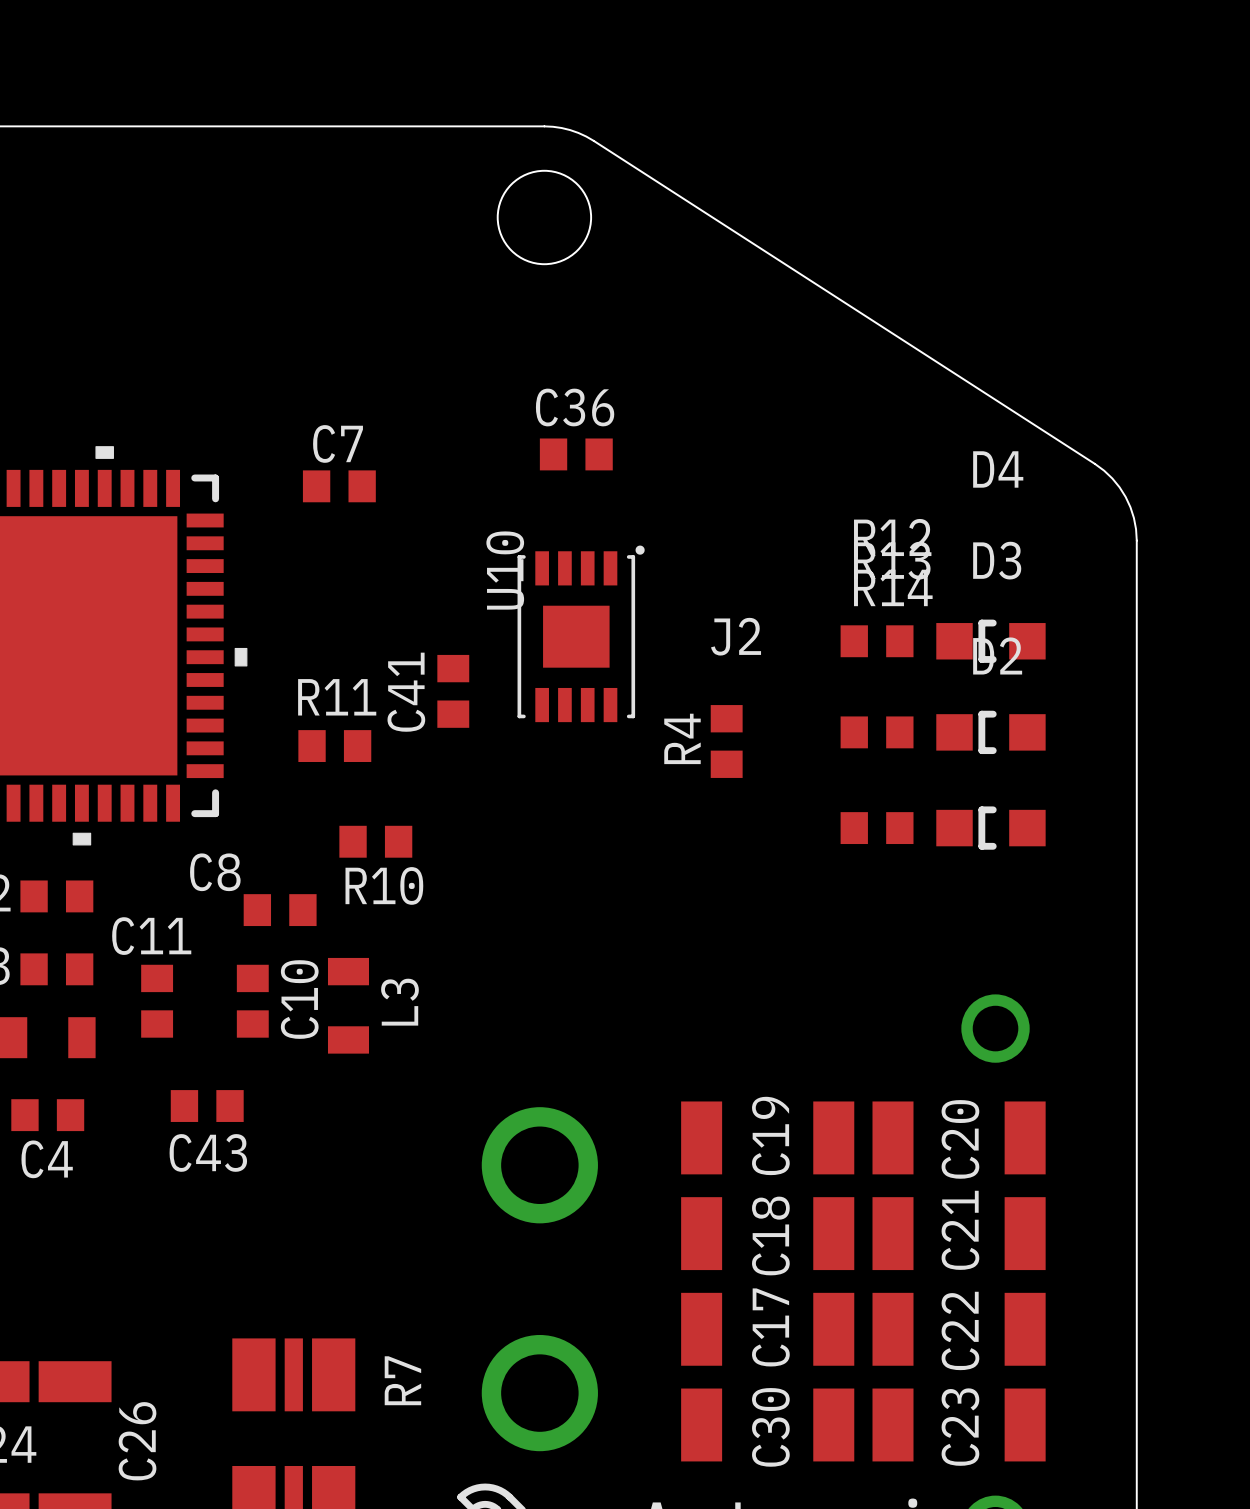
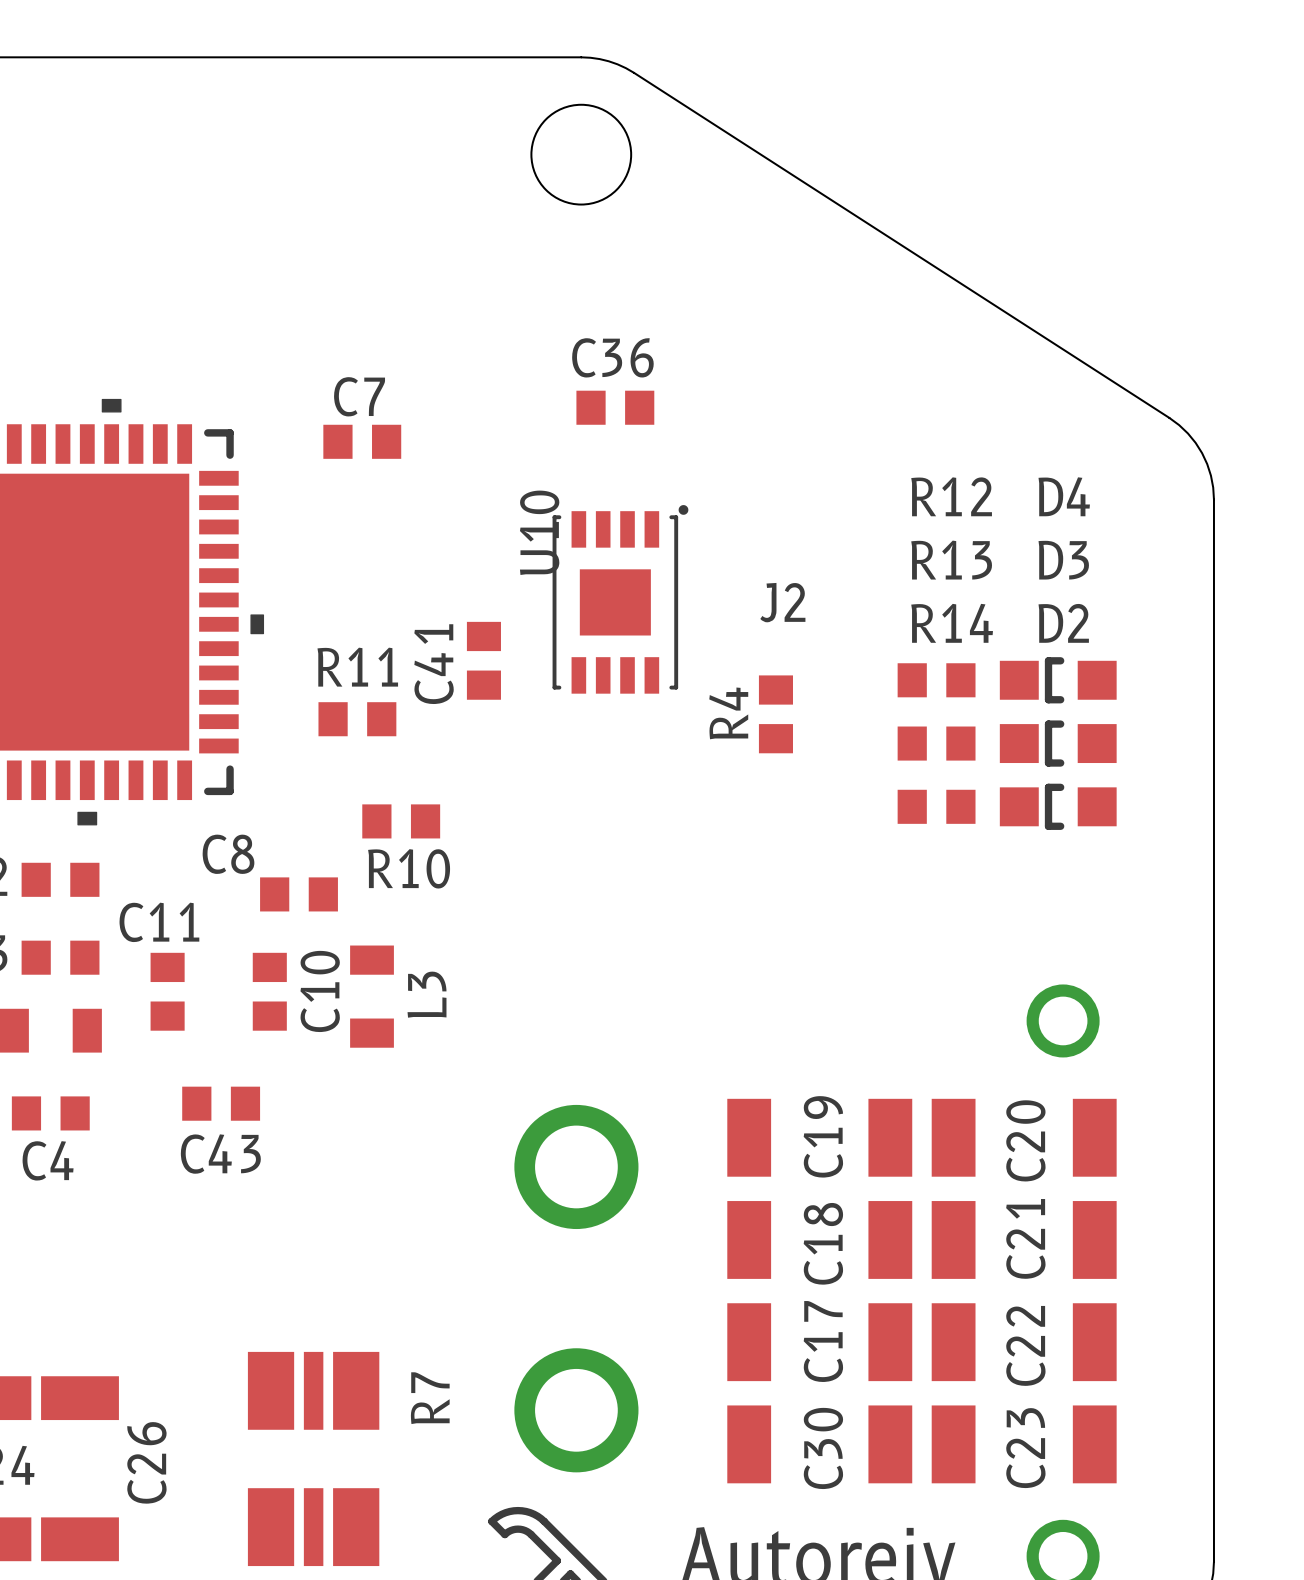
R14 position: (877, 641) -> (936, 680)
D4 position: (990, 641) -> (1058, 680)
R13 position: (877, 732) -> (936, 743)
D3 position: (990, 732) -> (1058, 743)

